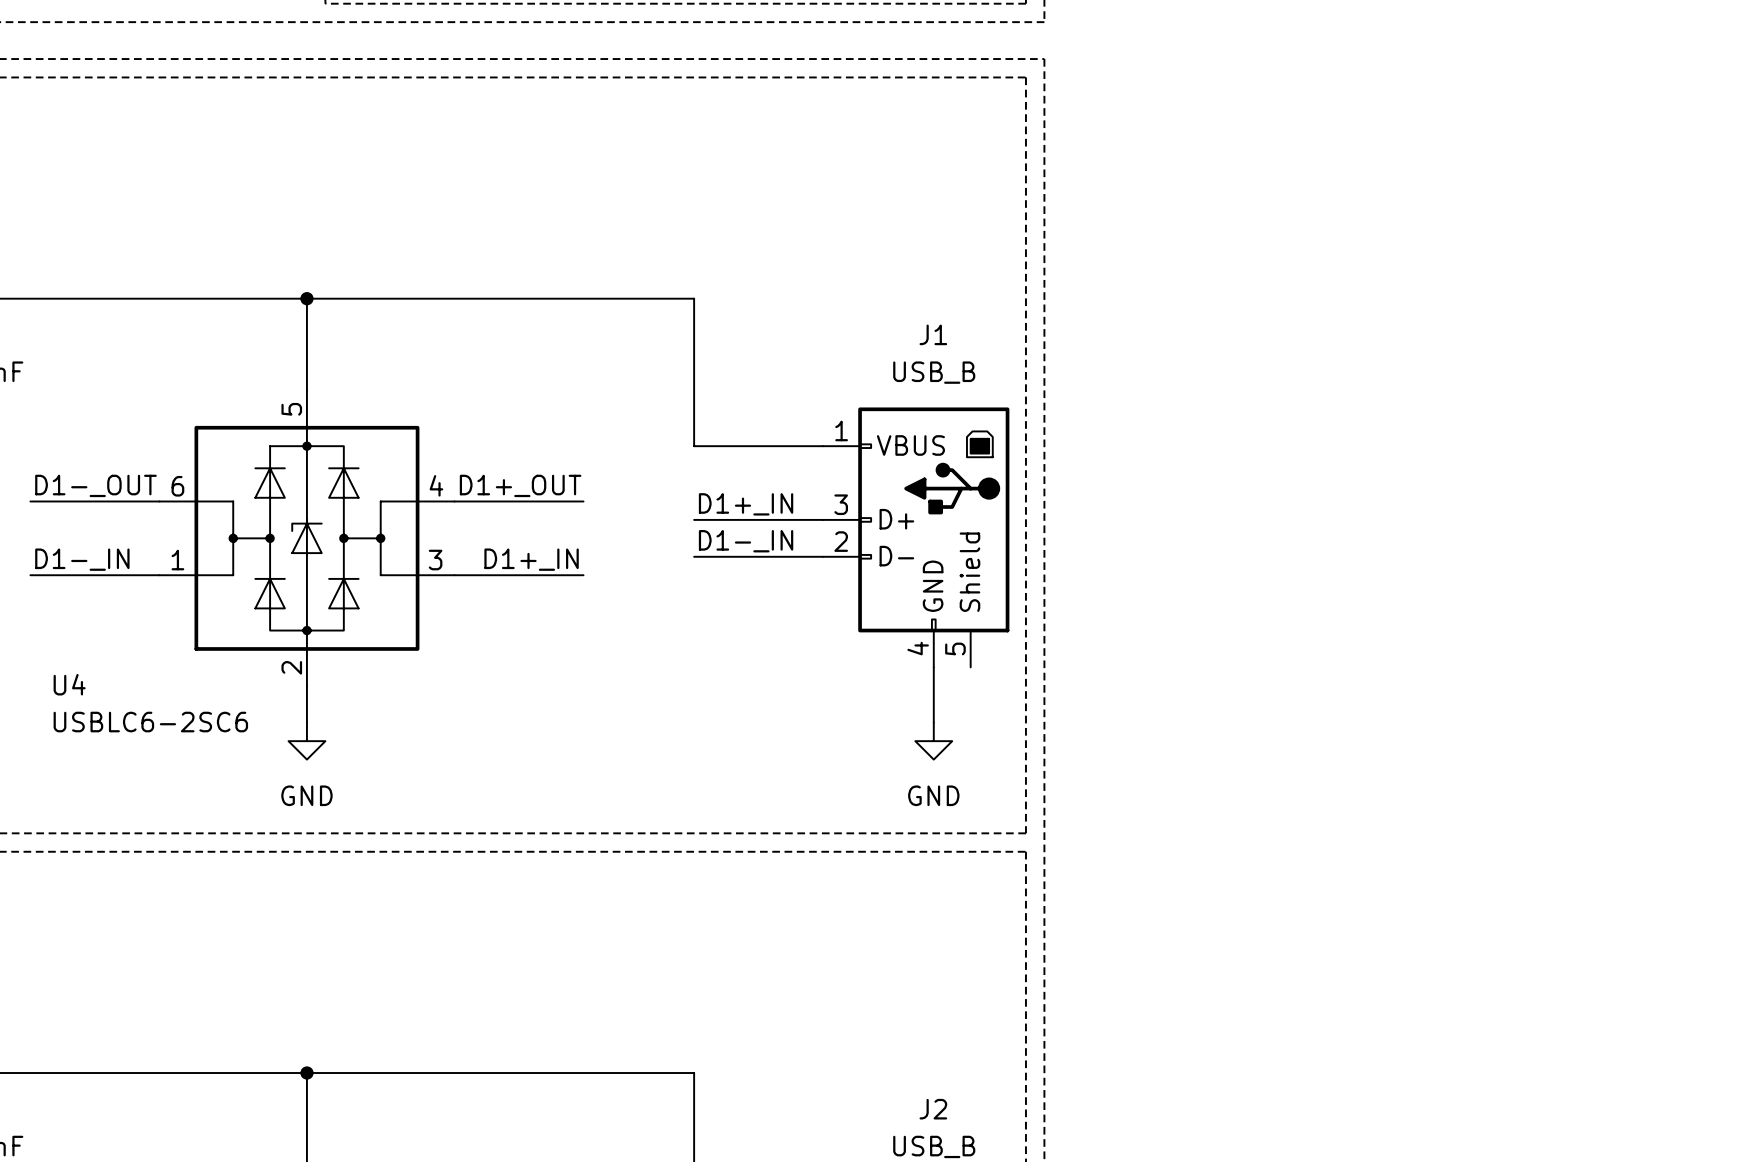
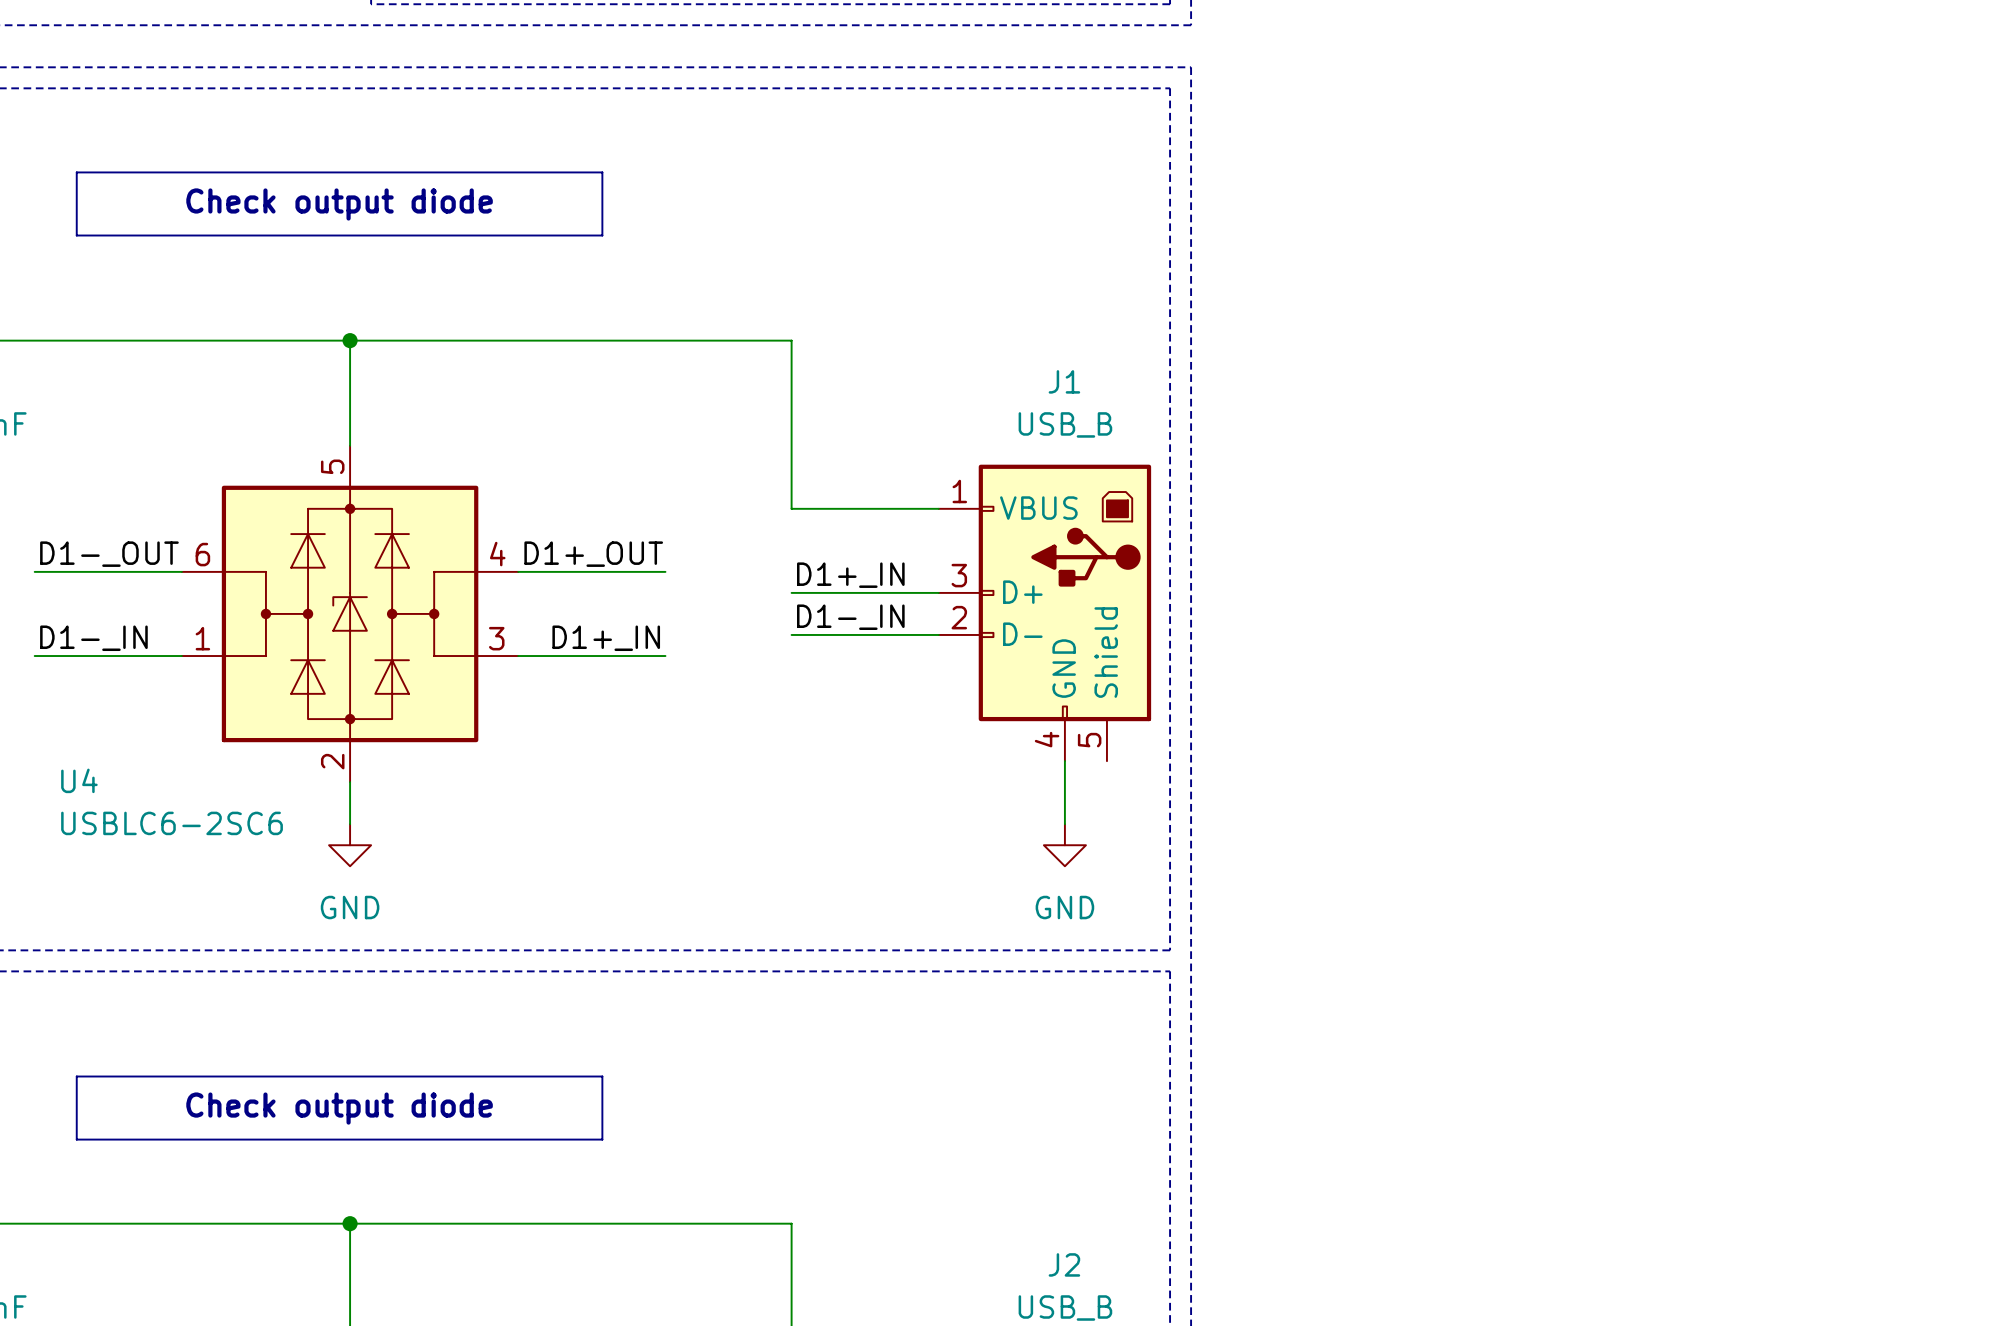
line: none -> (76, 172) (76, 235) (602, 235) (602, 172) (76, 172)
text: none -> Check output diode (339, 204)
line: none -> (76, 1076) (602, 1076) (602, 1139) (76, 1139) (76, 1076)
text: none -> Check output diode (339, 1108)

